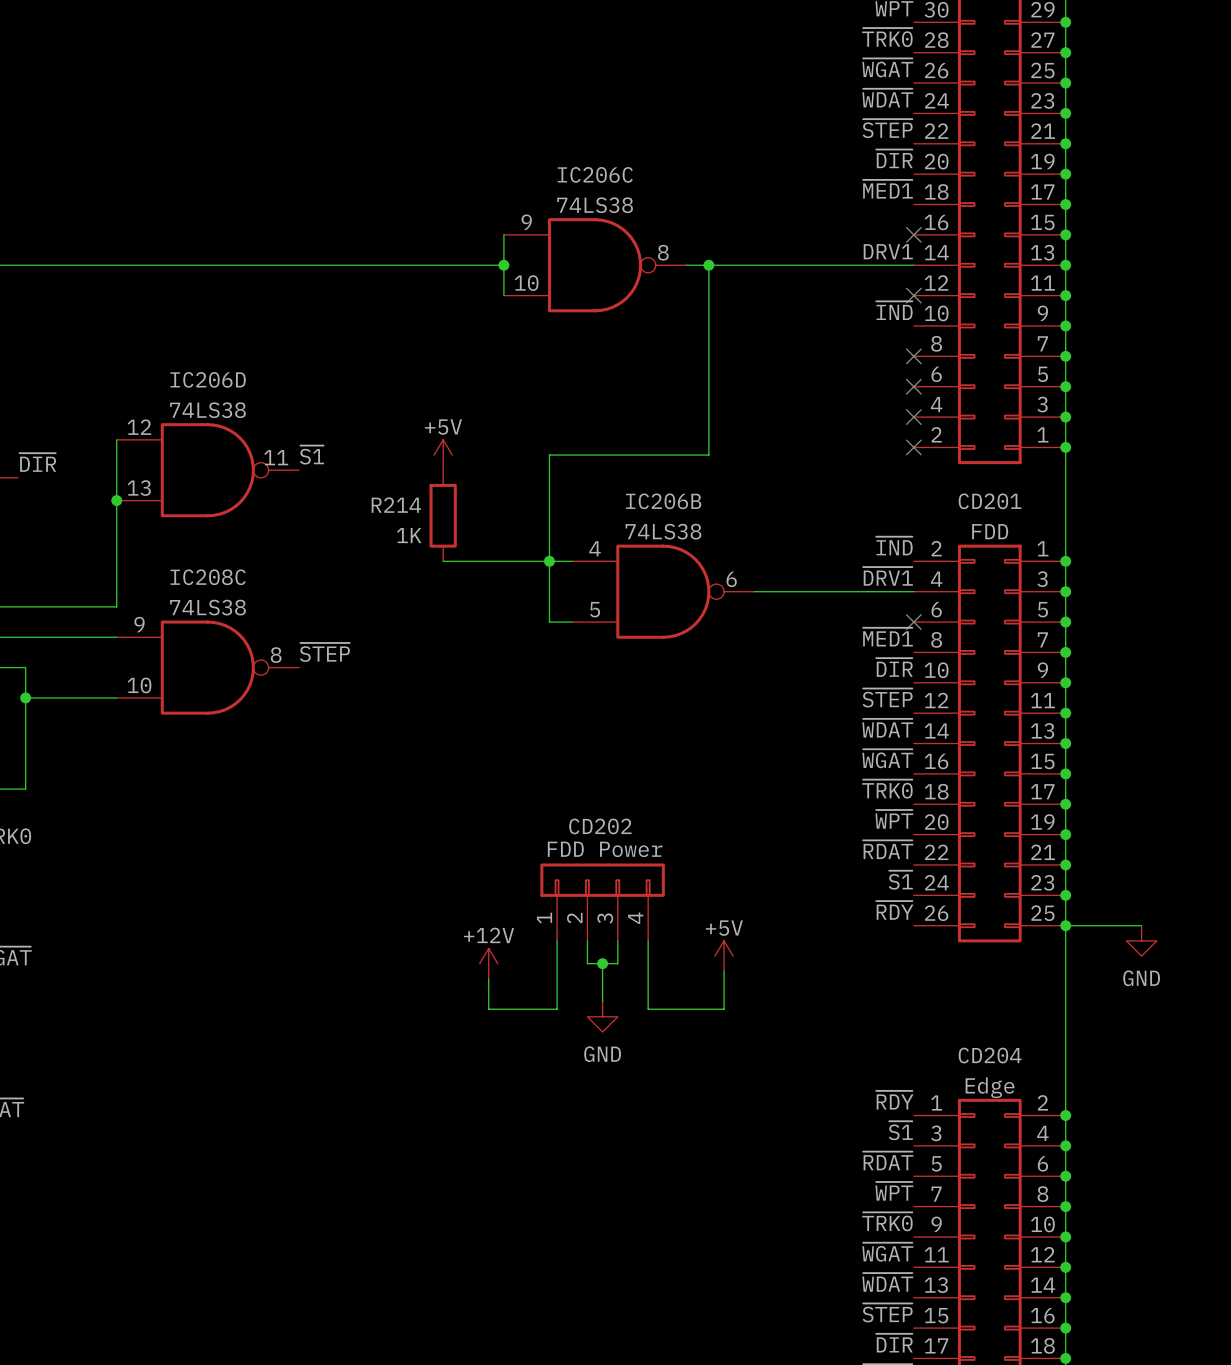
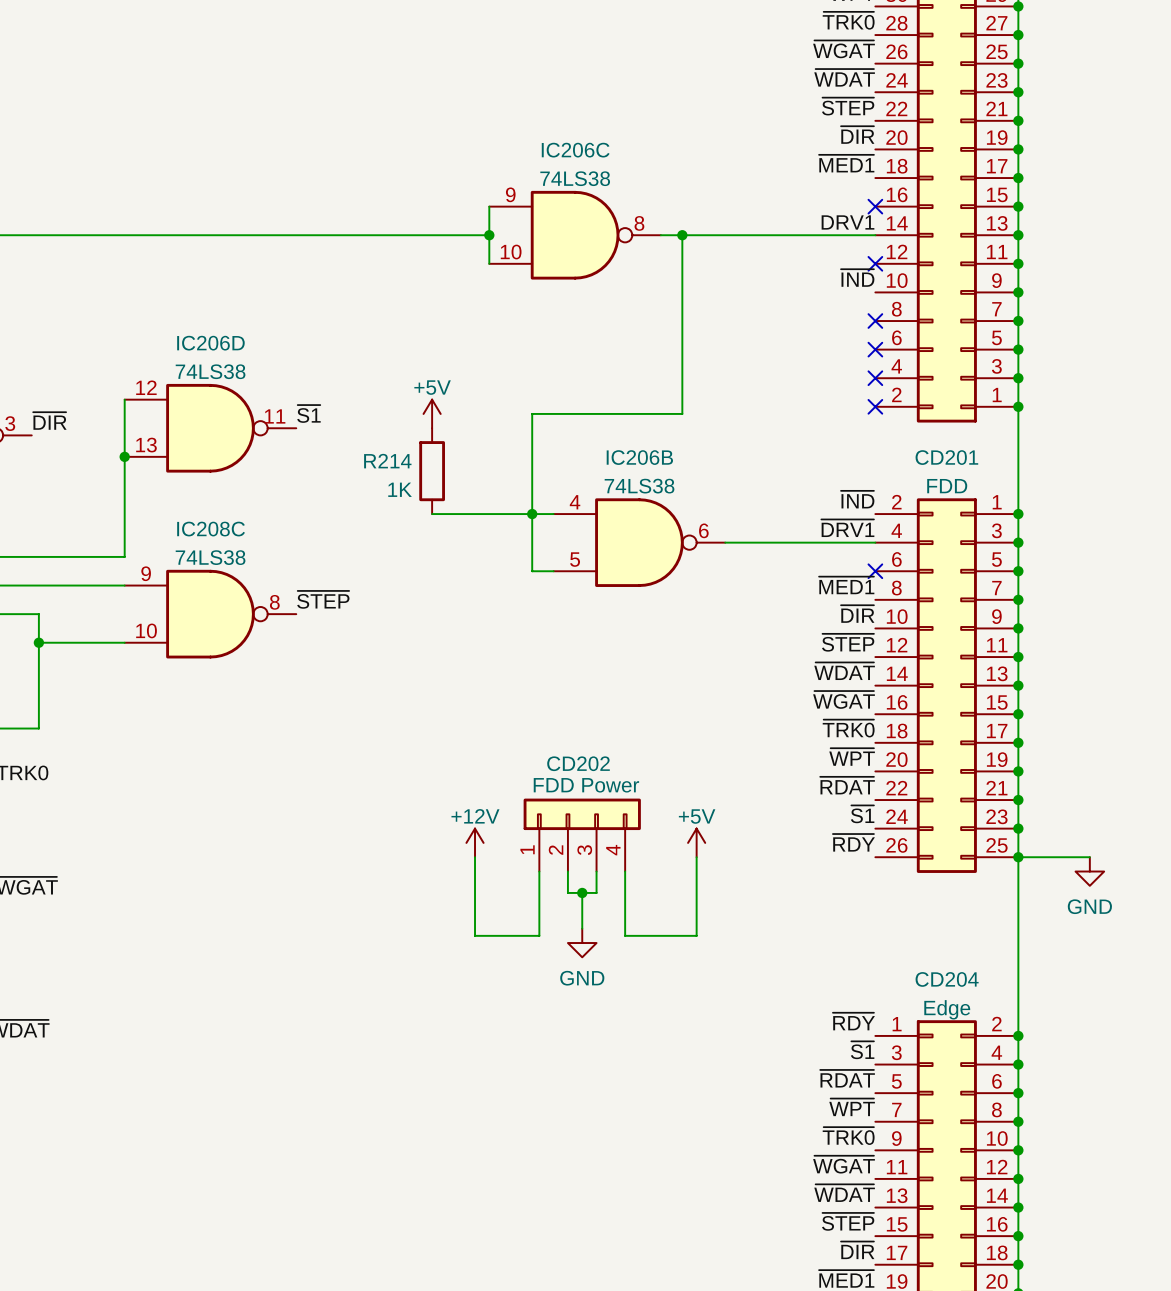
power symbol position: +5V (724, 956) -> +5V (696, 842)
power symbol position: +12V (488, 963) -> +12V (475, 842)

